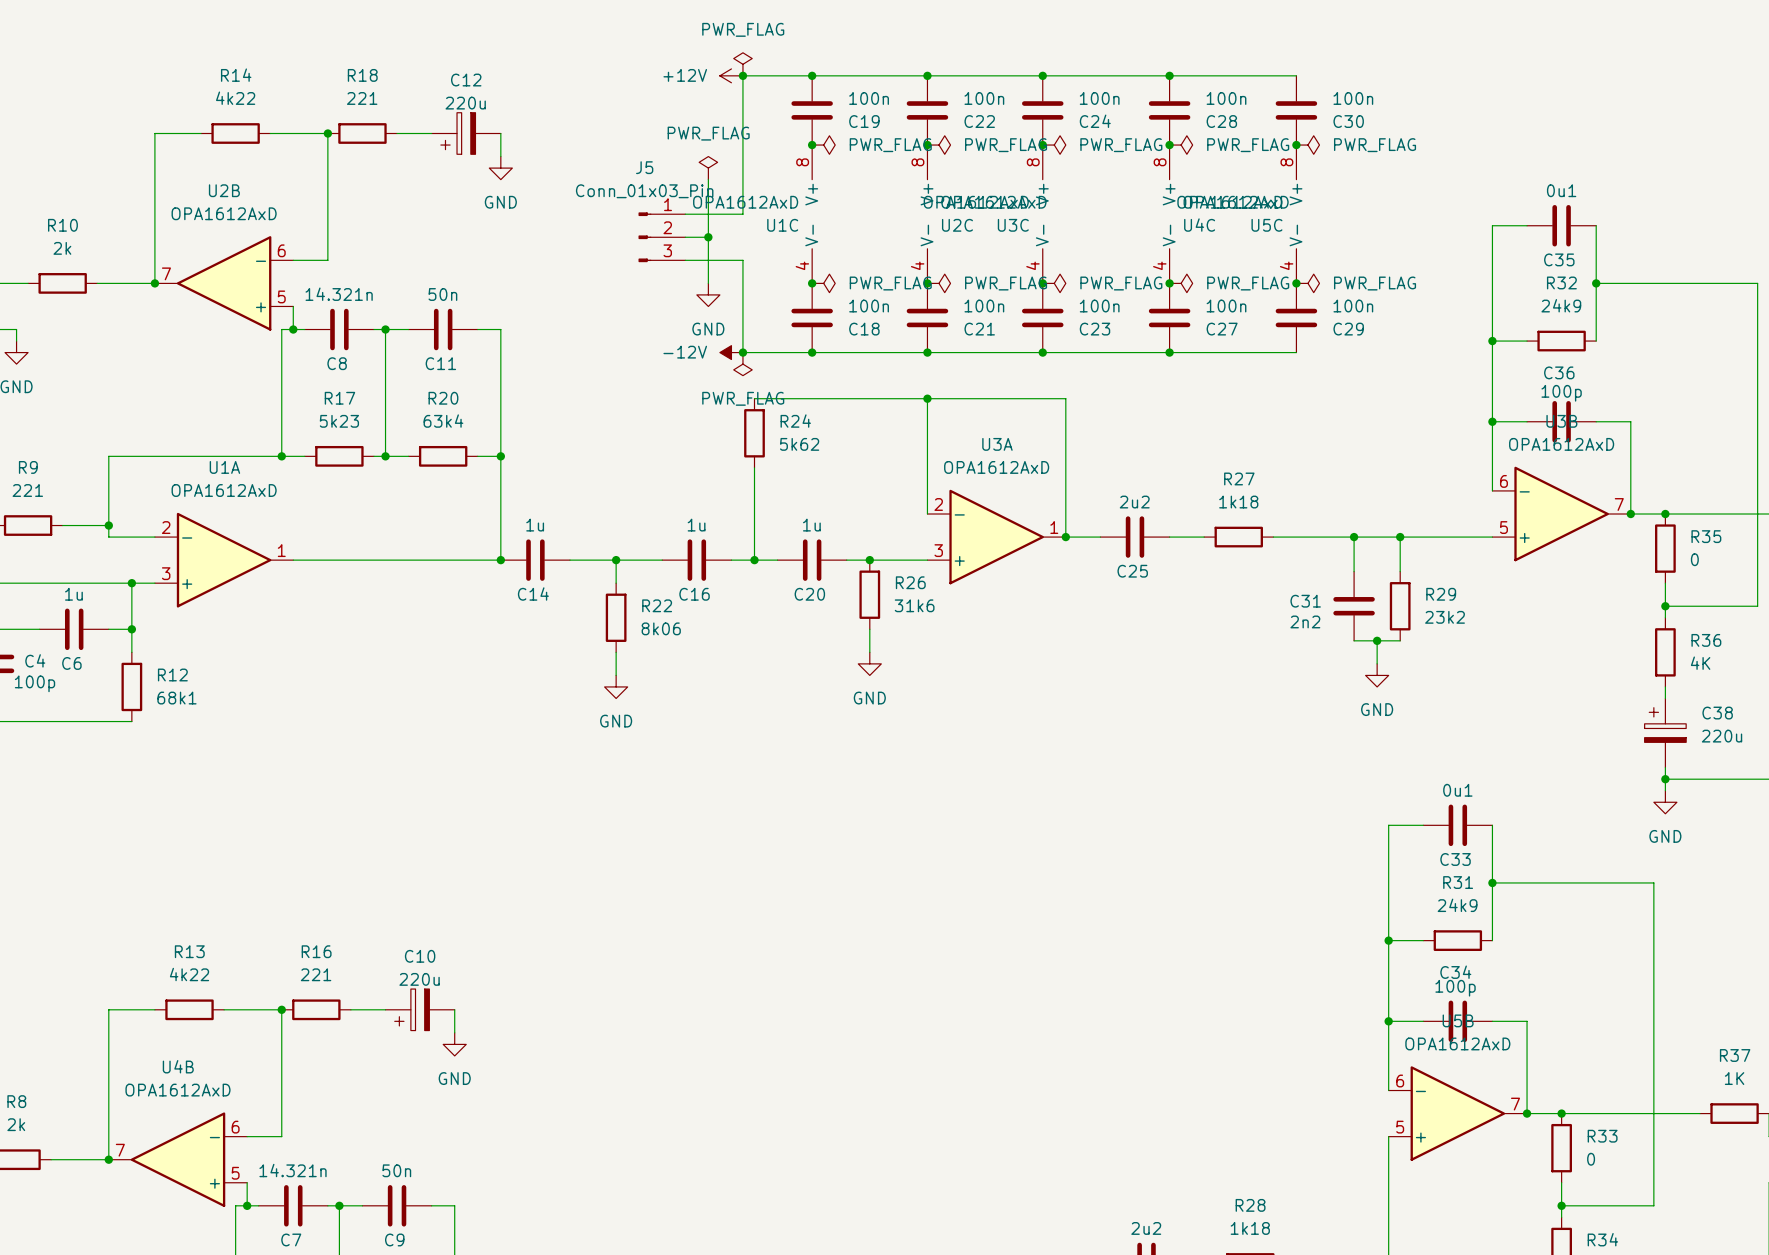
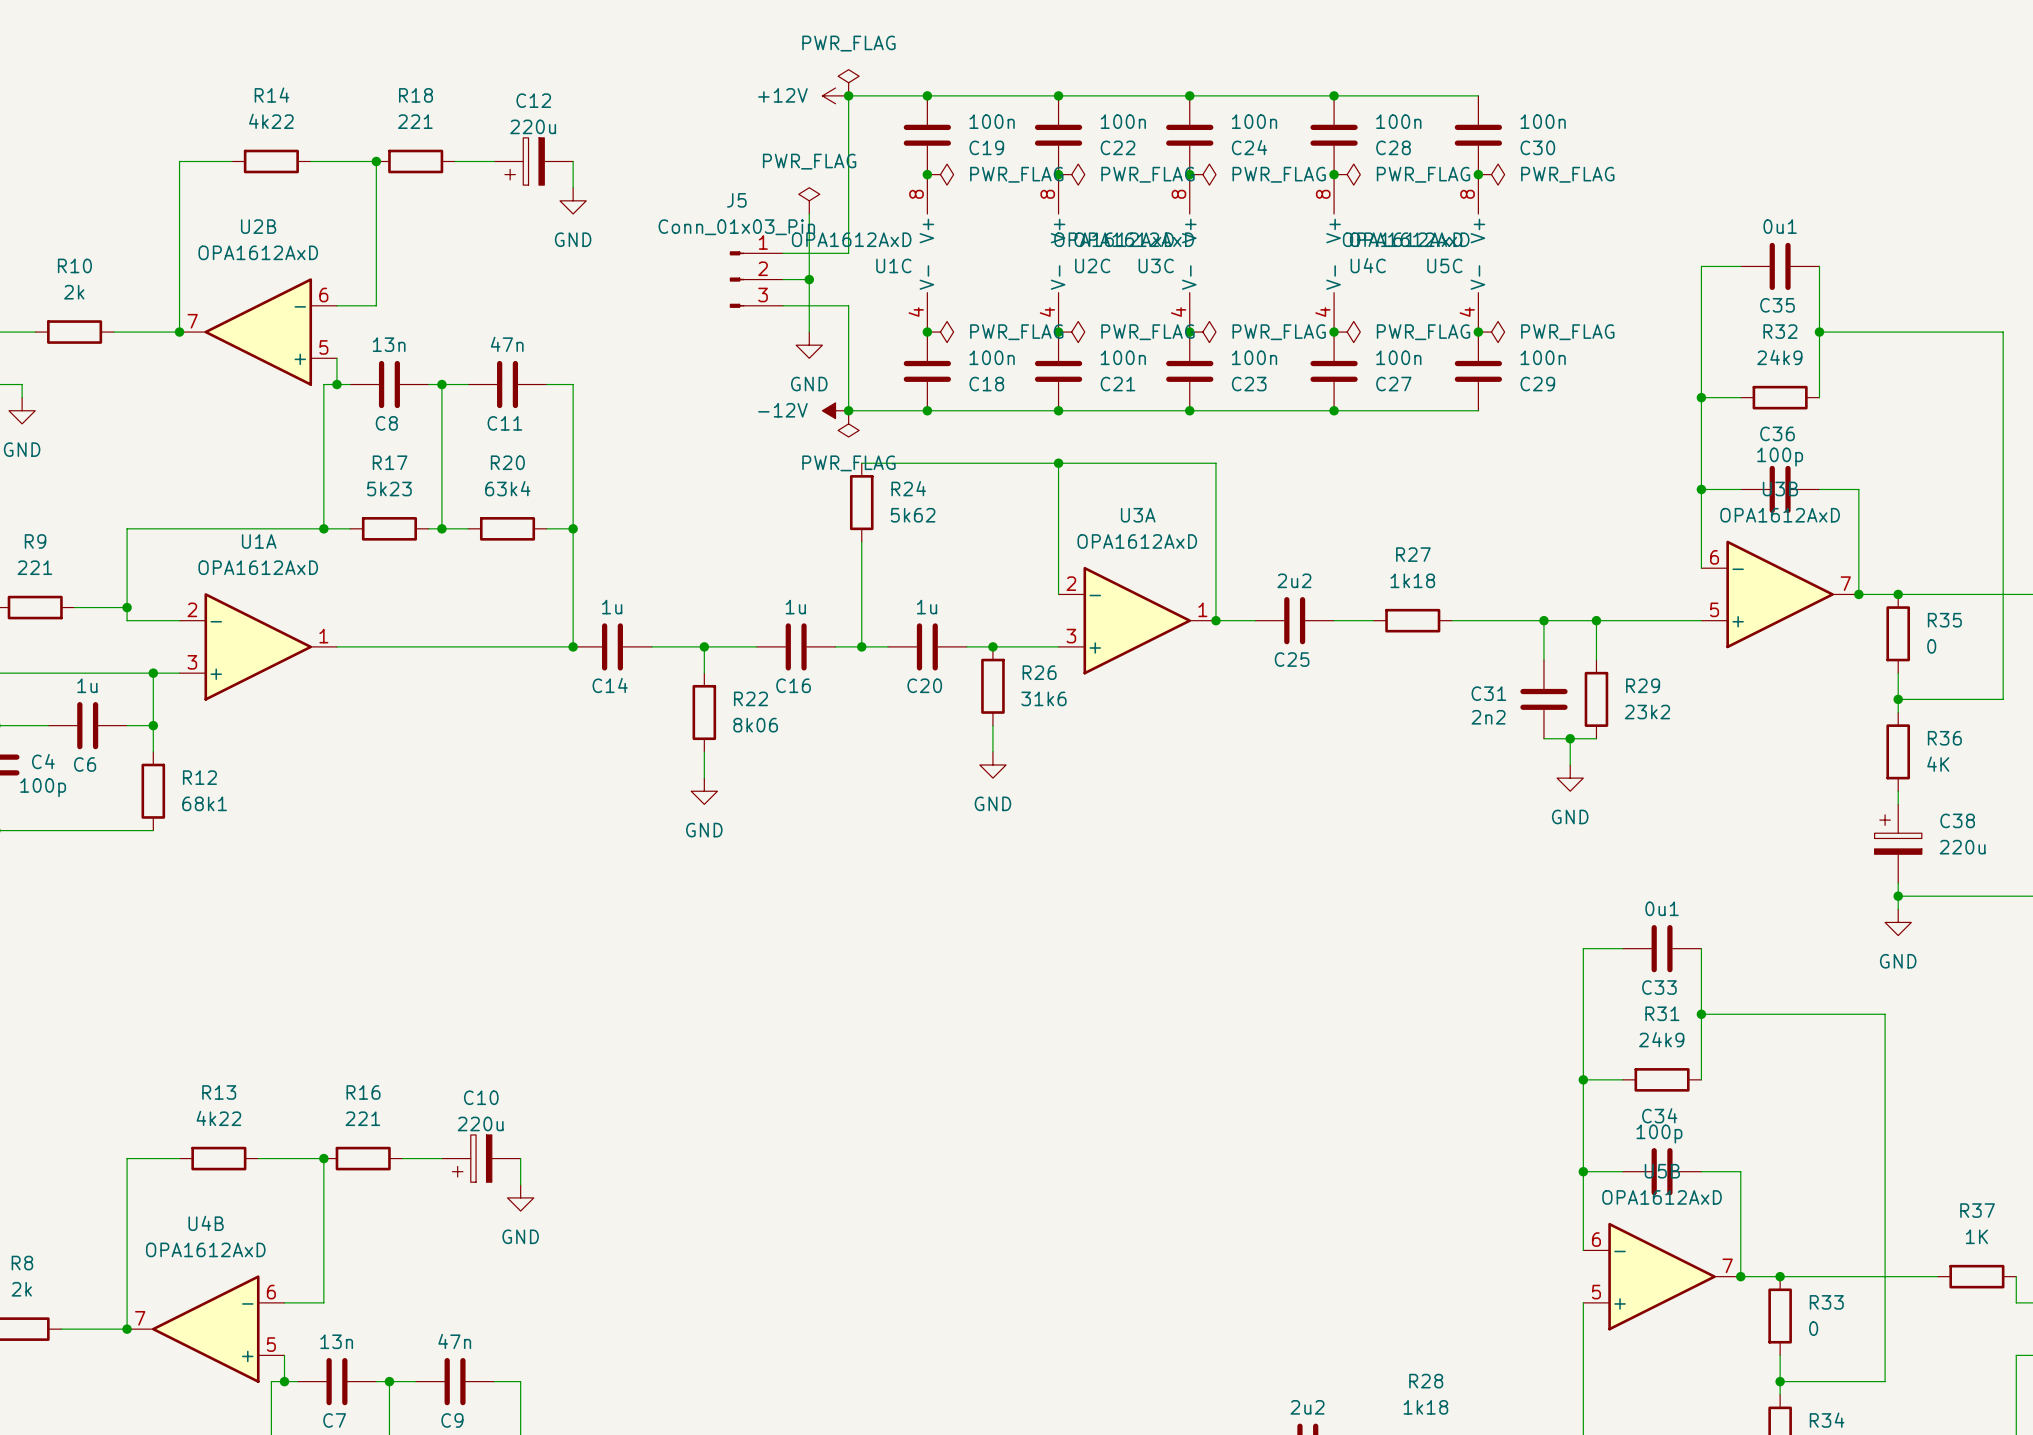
C8 value: 14.321n (339, 294) -> 13n (389, 344)
C11 value: 50n (442, 294) -> 47n (507, 344)
C7 value: 14.321n (293, 1170) -> 13n (336, 1341)
C9 value: 50n (396, 1170) -> 47n (454, 1341)

